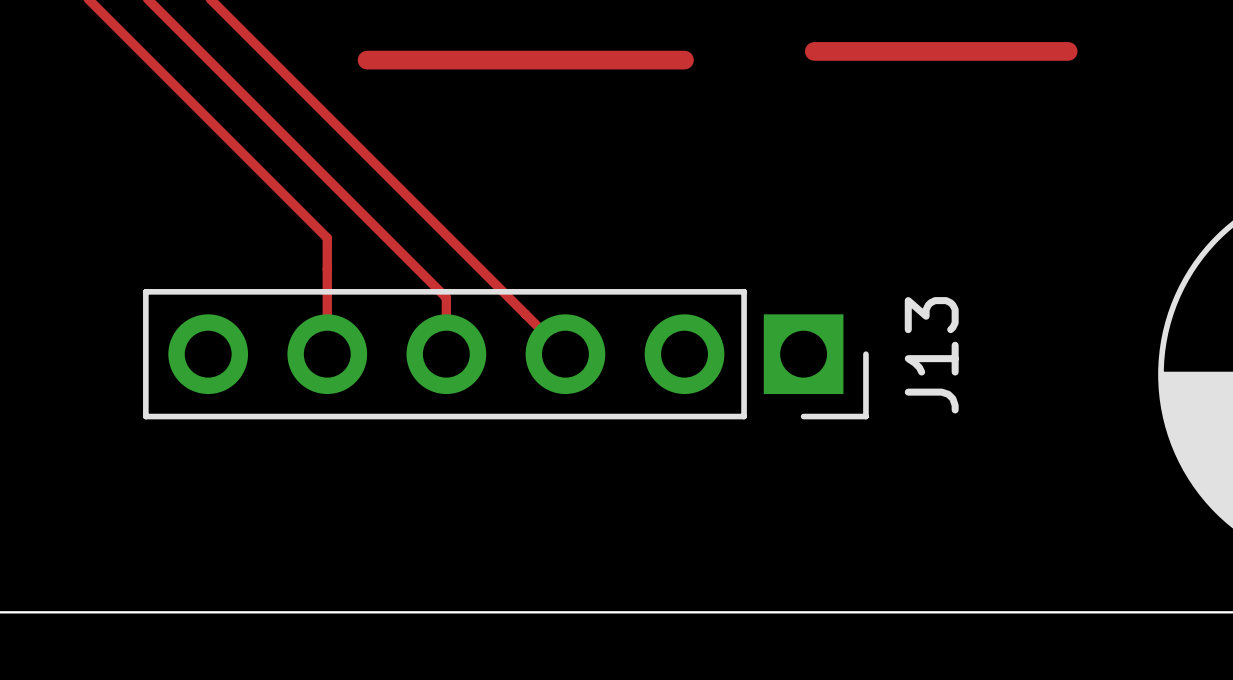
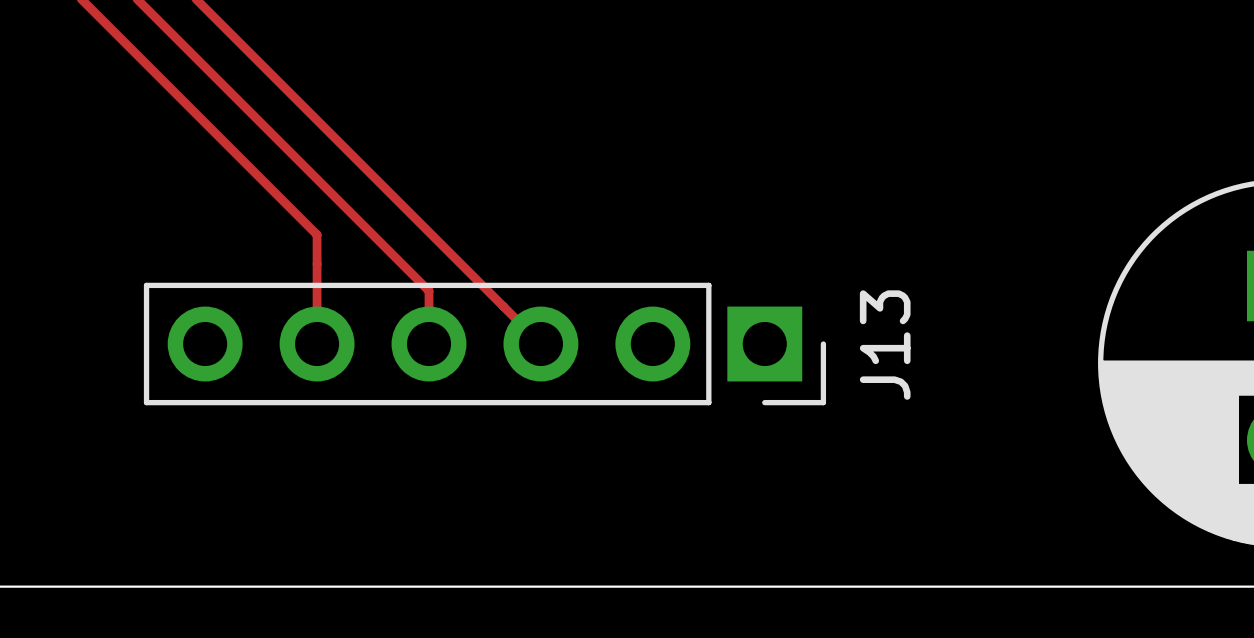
track: (814, 51) (1068, 51) -> none
track: (367, 60) (684, 60) -> none

